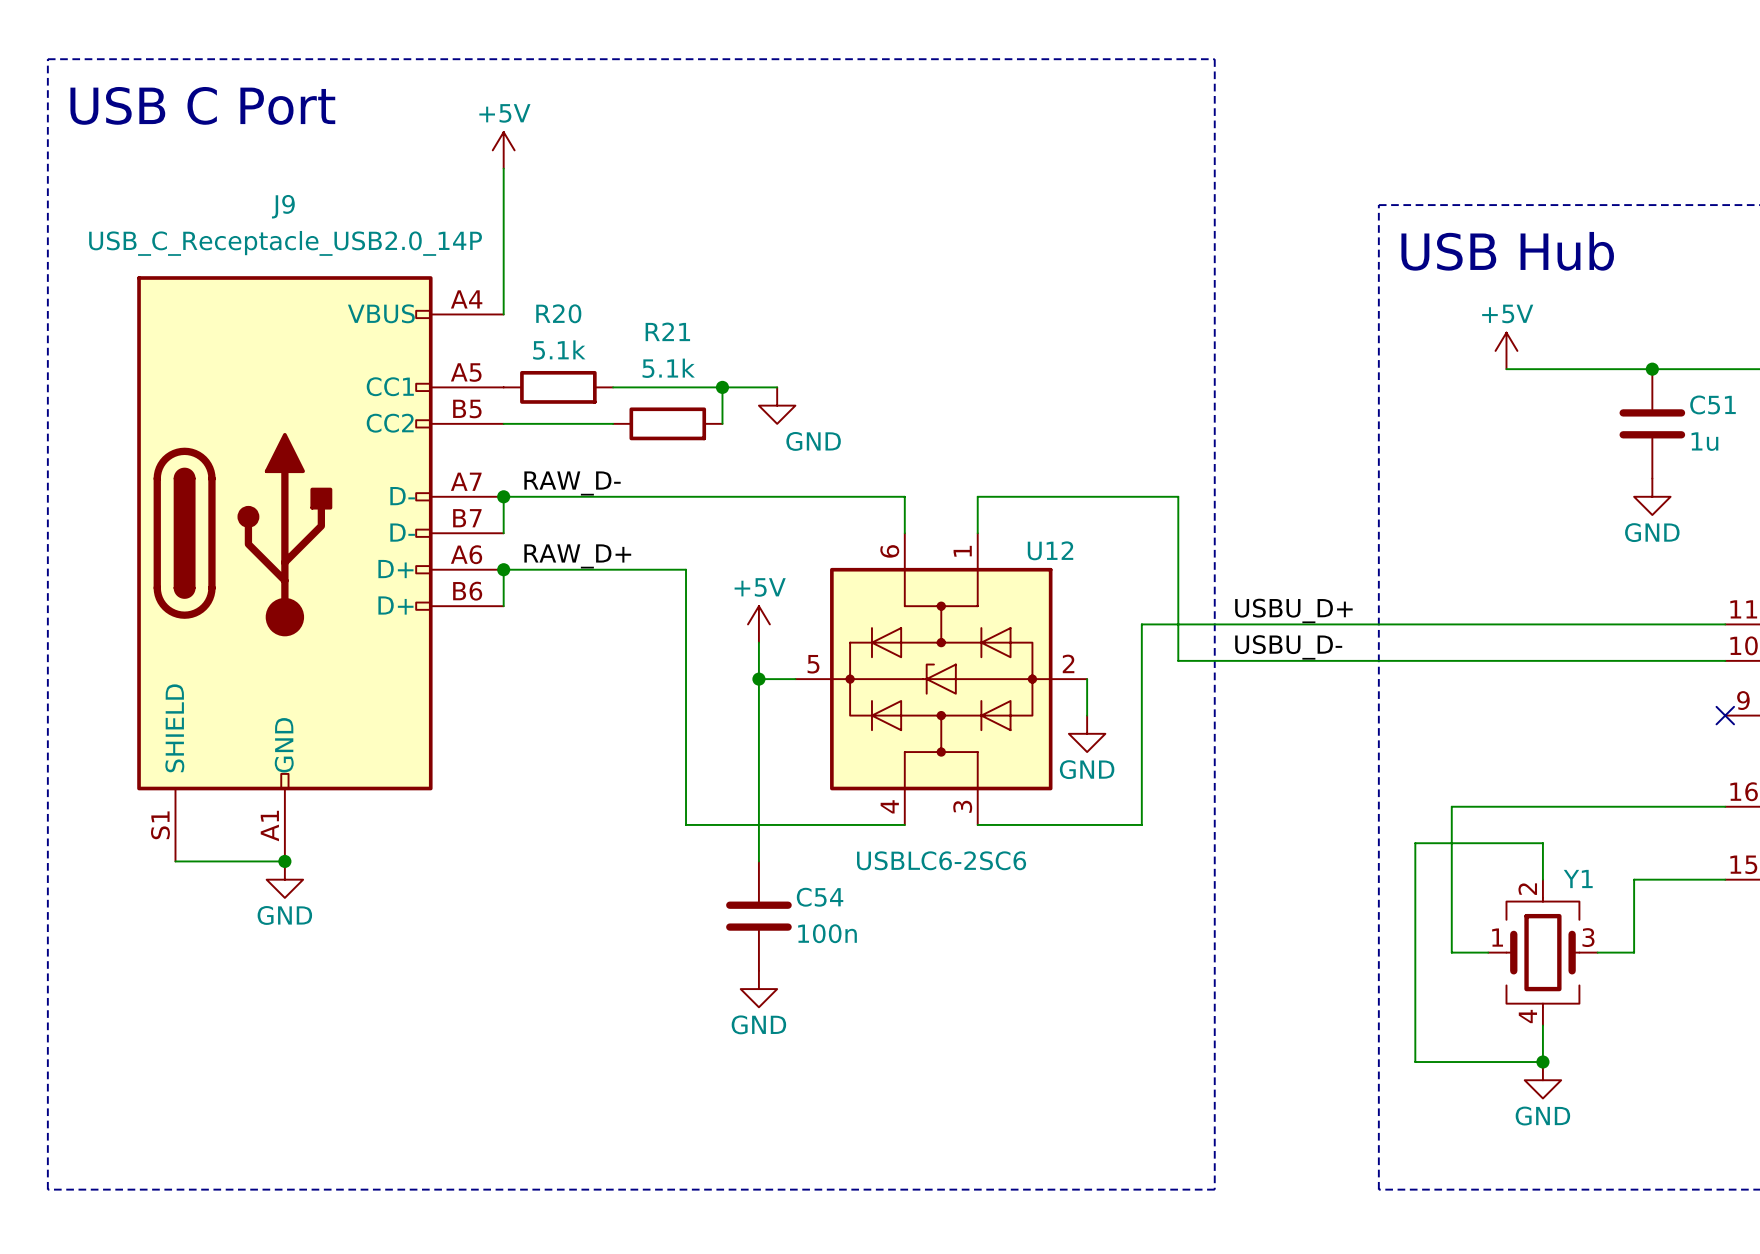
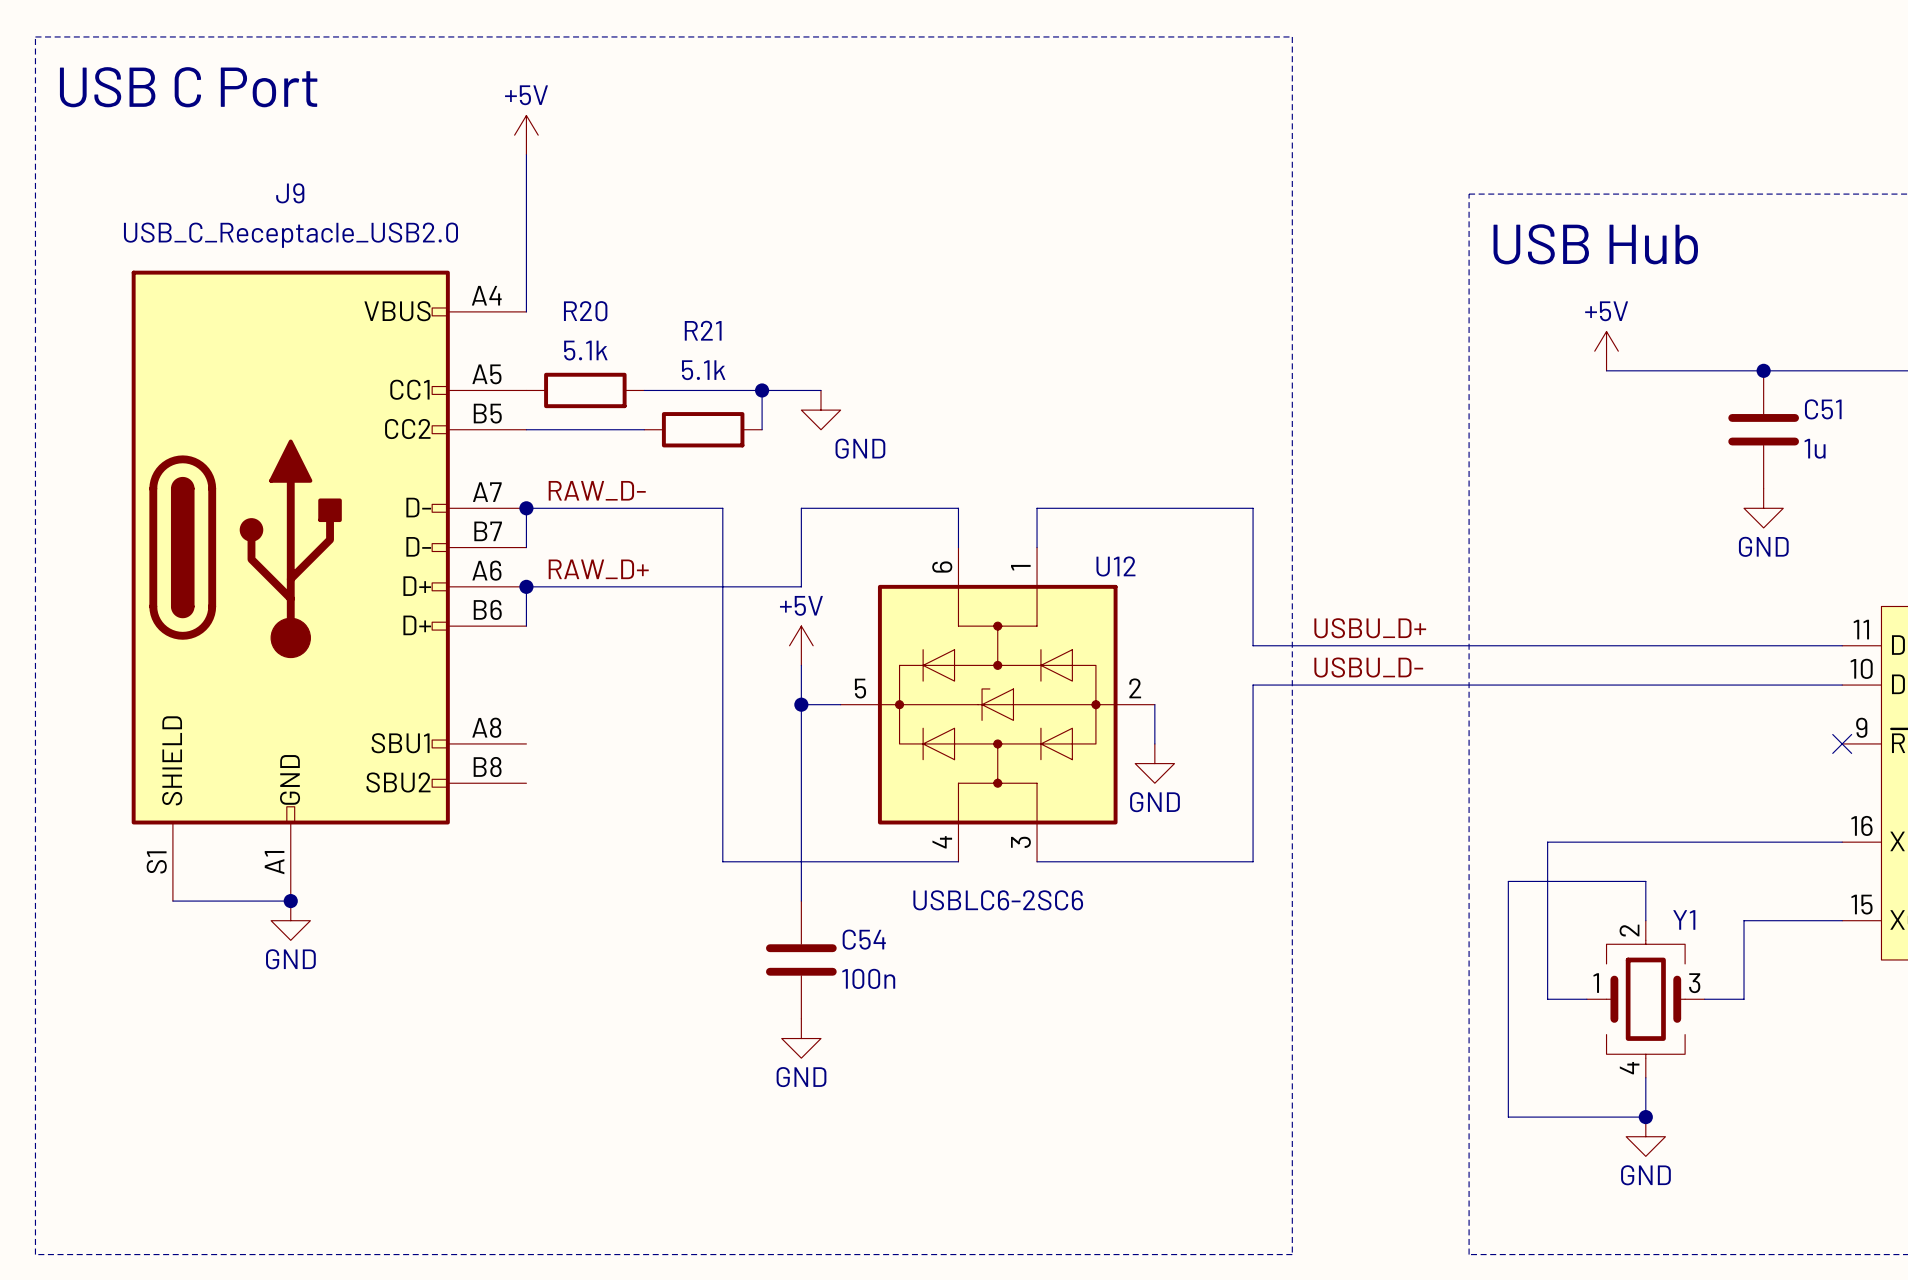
J9 value: USB_C_Receptacle_USB2.0_14P (285, 243) -> USB_C_Receptacle_USB2.0 (290, 235)
J9 symbol: [137, 276, 504, 862] -> [131, 270, 527, 902]
wire: (686, 496) (758, 496) -> (722, 508) (722, 586) (801, 586) (801, 508)
wire: (1178, 660) (1178, 624) (1141, 624) (1141, 824) -> (1253, 685) (1253, 861) (1213, 861)

